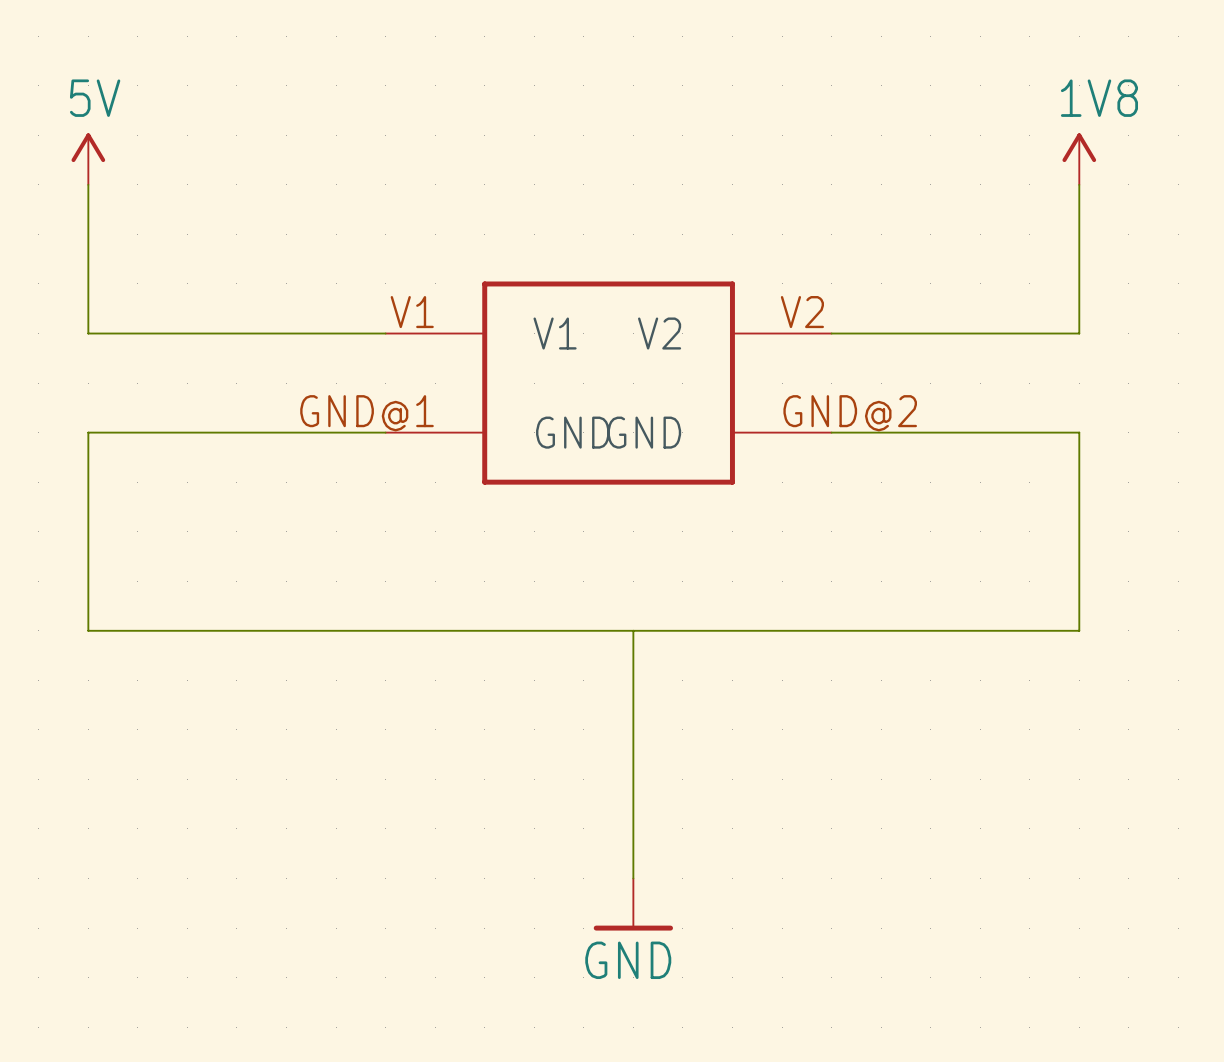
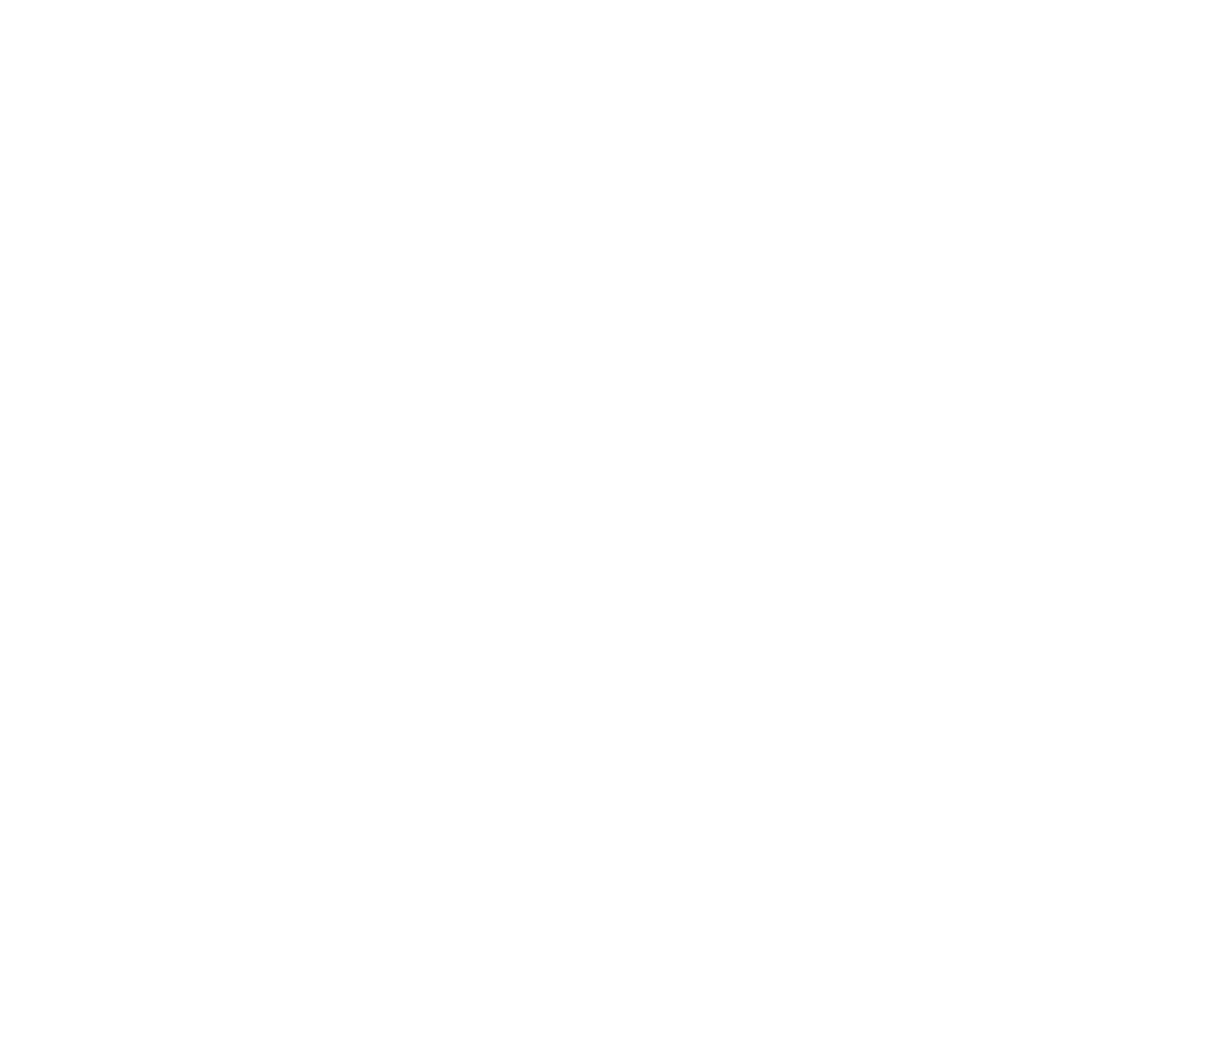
power symbol: 5V (88, 159) -> none
power symbol: 1V8 (1079, 159) -> none
wire: (88, 184) (88, 333) (385, 333) -> none
wire: (1079, 184) (1079, 333) (831, 333) -> none
part: (608, 383) -> none
wire: (385, 432) (88, 432) (88, 630) (1079, 630) (1079, 432) (831, 432) -> none
wire: (633, 630) (633, 878) -> none
power symbol: GND (633, 904) -> none

